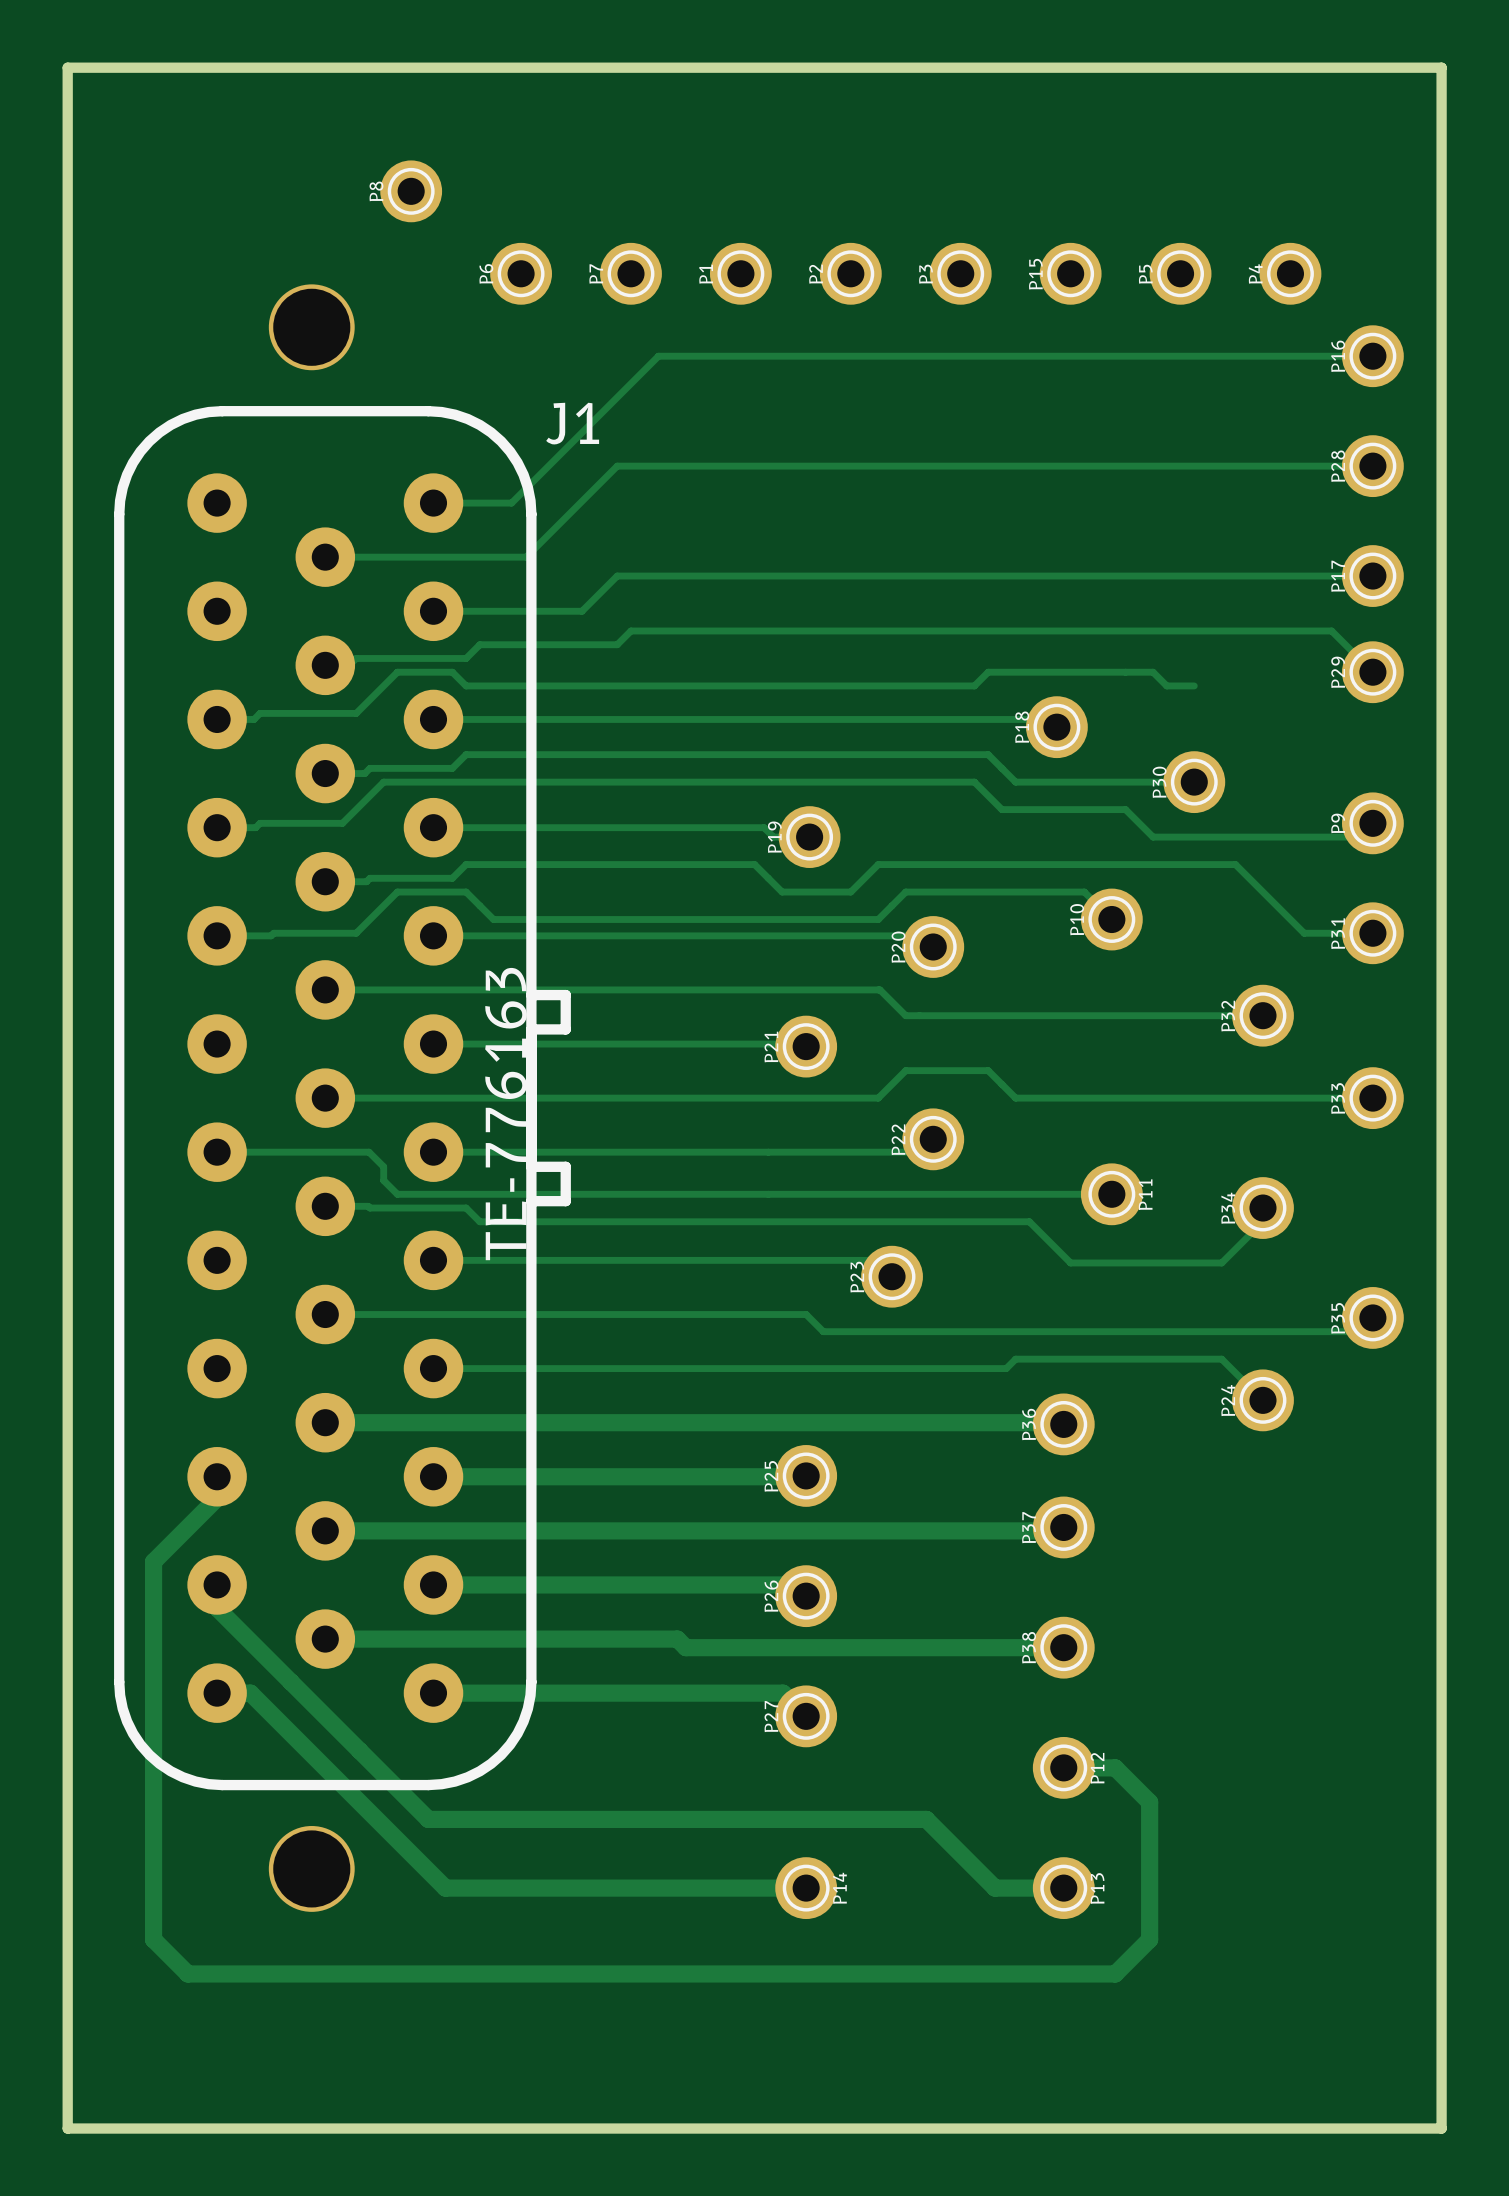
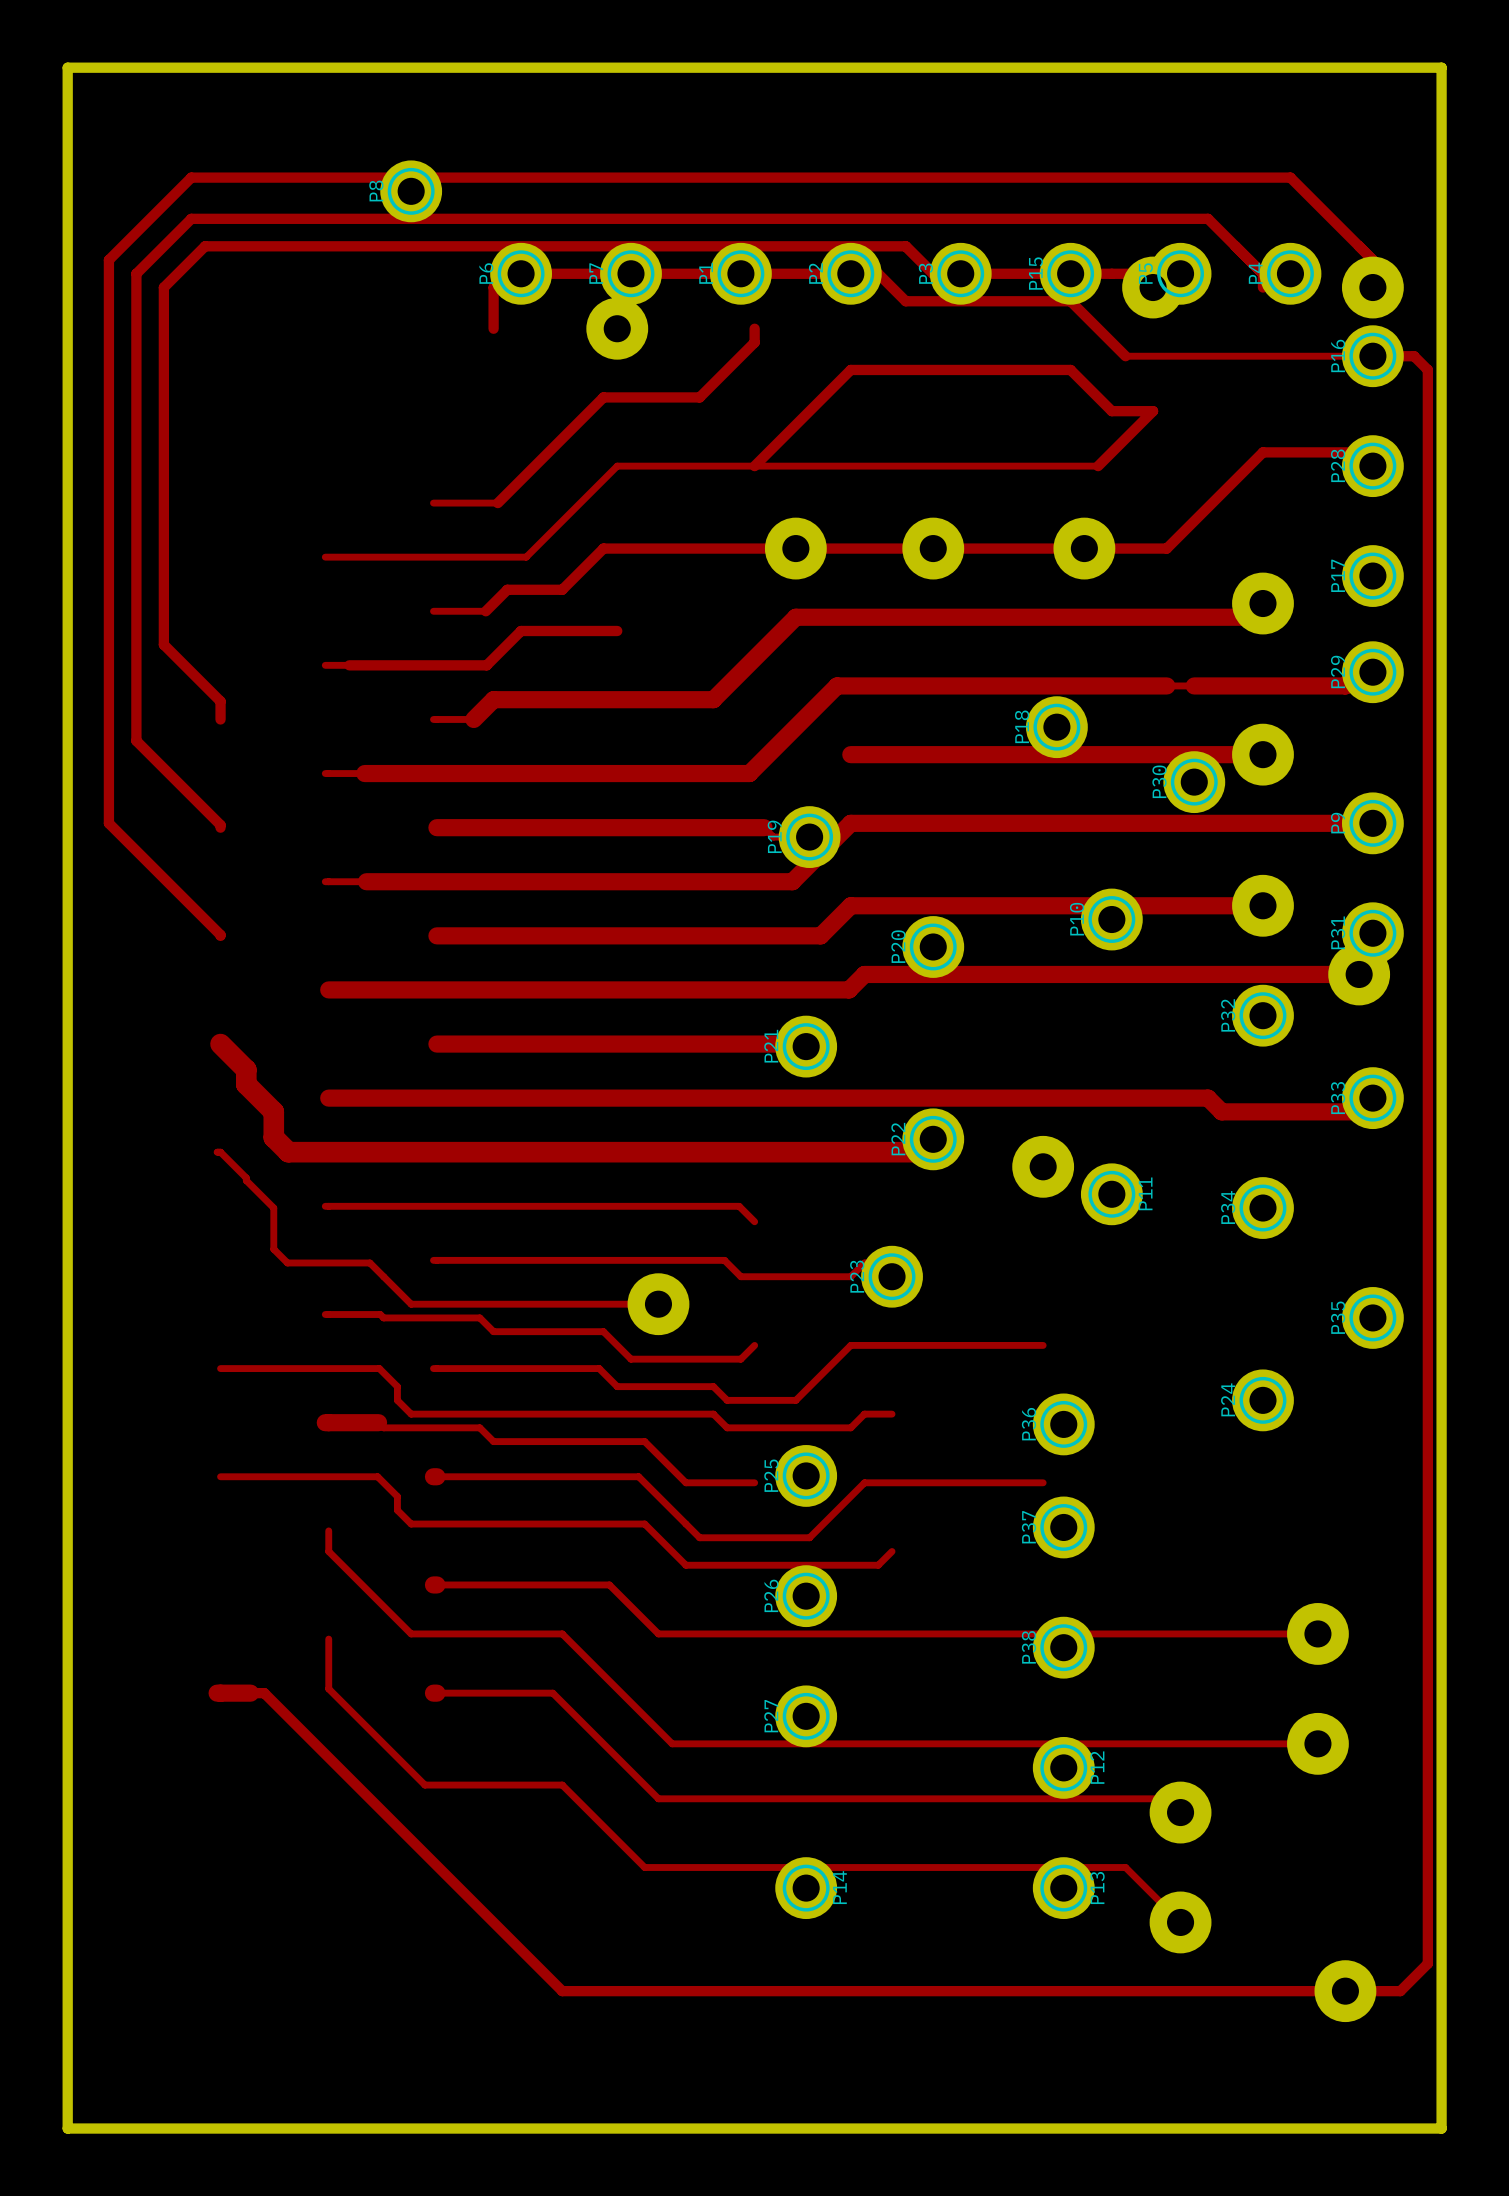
track: none -> (1153, 287) (1139, 273) (933, 273) (905, 246) (205, 246) (163, 287) (163, 644) (220, 701) (220, 719)
part: none -> (1153, 287)
track: none -> (1262, 287) (1262, 273) (1208, 218) (191, 218) (136, 273) (136, 740) (220, 825) (220, 827)
track: none -> (1372, 287) (1372, 260) (1290, 177) (191, 177) (108, 260) (108, 823) (220, 935)
part: none -> (1372, 287)
part: none -> (617, 328)
track: none -> (754, 328) (754, 342) (699, 397) (603, 397) (497, 503)
track: (1125, 356) (658, 356) (511, 503) (497, 503) -> (1125, 356) (1070, 301) (905, 301) (878, 273) (507, 273) (493, 287) (493, 328)
track: (1098, 466) (1372, 466) -> (1098, 466) (1153, 411) (1111, 411) (1070, 369) (850, 369) (754, 466)
part: none -> (795, 548)
part: none -> (933, 548)
part: none -> (1084, 548)
track: (1372, 576) (617, 576) (582, 611) (485, 611) -> (1359, 452) (1262, 452) (1166, 548) (603, 548) (562, 589) (507, 589) (485, 611)
part: none -> (1262, 603)
track: (349, 665) (356, 658) (466, 658) (479, 644) (617, 644) (630, 630) (1331, 630) (1372, 672) -> (349, 665) (486, 665) (521, 630) (617, 630)
track: none -> (1359, 672) (1345, 685) (1194, 685)
track: (837, 685) (466, 685) (452, 672) (397, 672) (356, 713) (260, 713) (254, 719) (217, 719) -> none
track width: thin (837, 685) (974, 685) -> thick (837, 685) (974, 685)
track: (974, 685) (988, 672) (1153, 672) (1166, 685) -> (974, 685) (1166, 685)
track: (473, 719) (1049, 719) (1056, 727) -> (473, 719) (493, 699) (713, 699) (795, 617) (1249, 617) (1262, 603)
track: (850, 754) (466, 754) (452, 768) (369, 768) (364, 773) -> (837, 685) (749, 773) (364, 773)
track width: thin (850, 754) (988, 754) -> thick (850, 754) (988, 754)
track: (988, 754) (1015, 782) (1194, 782) -> (988, 754) (1262, 754)
part: none -> (1262, 754)
track: (1372, 823) (1359, 837) (1153, 837) (1125, 809) (1001, 809) (974, 782) (383, 782) (342, 823) (260, 823) (255, 827) (217, 827) -> none
track width: thin (436, 827) (764, 827) -> thick (436, 827) (764, 827)
track: (366, 881) (369, 878) (452, 878) (466, 864) (754, 864) (782, 892) (850, 892) (878, 864) (1235, 864) (1304, 933) (1372, 933) -> (366, 881) (792, 881) (850, 823) (1359, 823)
part: none -> (1262, 905)
track: (1111, 919) (1084, 892) (905, 892) (878, 919) (493, 919) (466, 892) (397, 892) (356, 933) (273, 933) (271, 935) (217, 935) -> none
track width: thin (436, 935) (820, 935) -> thick (436, 935) (820, 935)
track: (820, 935) (922, 935) (933, 946) -> (820, 935) (850, 905) (1262, 905)
part: none -> (1359, 974)
track width: thin (328, 989) (849, 989) -> thick (328, 989) (849, 989)
track: (849, 989) (880, 989) (905, 1015) (1262, 1015) -> (849, 989) (864, 974) (1359, 974)
track width: thin (436, 1044) (803, 1044) -> thick (436, 1044) (803, 1044)
track width: thin (328, 1098) (878, 1098) -> thick (328, 1098) (878, 1098)
J1: TE-776163 (342, 1098) -> none
track: (878, 1098) (905, 1070) (988, 1070) (1015, 1098) -> (878, 1098) (1015, 1098)
track width: thin (1015, 1098) (1208, 1098) -> thick (1015, 1098) (1208, 1098)
track: (1208, 1098) (1372, 1098) -> (1208, 1098) (1221, 1111) (1359, 1111)
track: (220, 1152) (288, 1152) -> (220, 1044) (246, 1069) (246, 1084) (273, 1111) (273, 1137) (288, 1152)
track: none -> (220, 1152) (273, 1208) (273, 1249) (287, 1262) (369, 1262) (411, 1304) (658, 1304)
track width: thin (288, 1152) (369, 1152) -> thick (288, 1152) (369, 1152)
track: (369, 1152) (383, 1166) (383, 1180) (397, 1194) (1111, 1194) -> (369, 1152) (433, 1152)
track width: thin (433, 1152) (920, 1152) -> thick (433, 1152) (920, 1152)
part: none -> (1043, 1166)
track: (368, 1206) (369, 1208) (466, 1208) (479, 1221) (1029, 1221) (1070, 1262) (1221, 1262) (1262, 1221) (1262, 1208) -> (368, 1206) (739, 1206) (754, 1221)
track: (724, 1260) (875, 1260) (892, 1276) -> (724, 1260) (740, 1276) (850, 1276) (864, 1262) (892, 1262)
part: none -> (658, 1304)
track: (380, 1314) (806, 1314) (823, 1331) (1359, 1331) (1372, 1317) -> (380, 1314) (383, 1317) (479, 1317) (493, 1331) (603, 1331) (630, 1359) (740, 1359) (754, 1345)
track: none -> (220, 1368) (379, 1368) (397, 1386) (397, 1400) (411, 1414) (713, 1414) (727, 1427) (850, 1427) (864, 1414) (892, 1414)
track: (599, 1368) (1006, 1368) (1015, 1359) (1221, 1359) (1262, 1400) -> (599, 1368) (617, 1386) (713, 1386) (727, 1400) (795, 1400) (850, 1345) (1043, 1345)
track: (378, 1422) (1062, 1422) (1063, 1424) -> (378, 1422) (383, 1427) (479, 1427) (493, 1441) (644, 1441) (685, 1482) (754, 1482)
track: (806, 1475) (638, 1476) -> (1043, 1482) (864, 1482) (809, 1537) (699, 1537) (638, 1476)
track: (217, 1476) (217, 1498) (153, 1561) (153, 1939) (187, 1973) (1115, 1973) (1149, 1939) (1149, 1802) (1115, 1767) (1063, 1767) -> none
track: none -> (220, 1476) (377, 1476) (397, 1496) (397, 1510) (411, 1524) (644, 1524) (685, 1565) (878, 1565) (892, 1551)
track width: thick (436, 1476) (638, 1476) -> thin (436, 1476) (638, 1476)
track: (1063, 1527) (1060, 1530) (325, 1530) -> none
track: none -> (328, 1530) (328, 1551) (411, 1633) (562, 1633) (672, 1743) (1317, 1743)
track: (217, 1584) (217, 1608) (428, 1819) (926, 1819) (995, 1888) (1063, 1888) -> none
track width: thick (436, 1584) (609, 1584) -> thin (436, 1584) (609, 1584)
track: (609, 1584) (794, 1584) (806, 1596) -> (609, 1584) (658, 1633) (1317, 1633)
part: none -> (1317, 1633)
track: (325, 1639) (677, 1639) (685, 1647) (1063, 1647) -> none
track: none -> (328, 1639) (328, 1688) (424, 1785) (562, 1785) (644, 1867) (1125, 1867) (1180, 1922)
track: (250, 1693) (445, 1888) (806, 1888) -> (250, 1693) (264, 1693) (562, 1991) (1400, 1991) (1427, 1963) (1427, 369) (1414, 356) (1372, 356)
track width: thick (436, 1693) (552, 1693) -> thin (436, 1693) (552, 1693)
track: (552, 1693) (782, 1693) (806, 1716) -> (552, 1693) (658, 1798) (1166, 1798) (1180, 1812)
part: none -> (1317, 1743)
part: none -> (1180, 1812)
part: none -> (1180, 1922)
part: none -> (1345, 1991)

